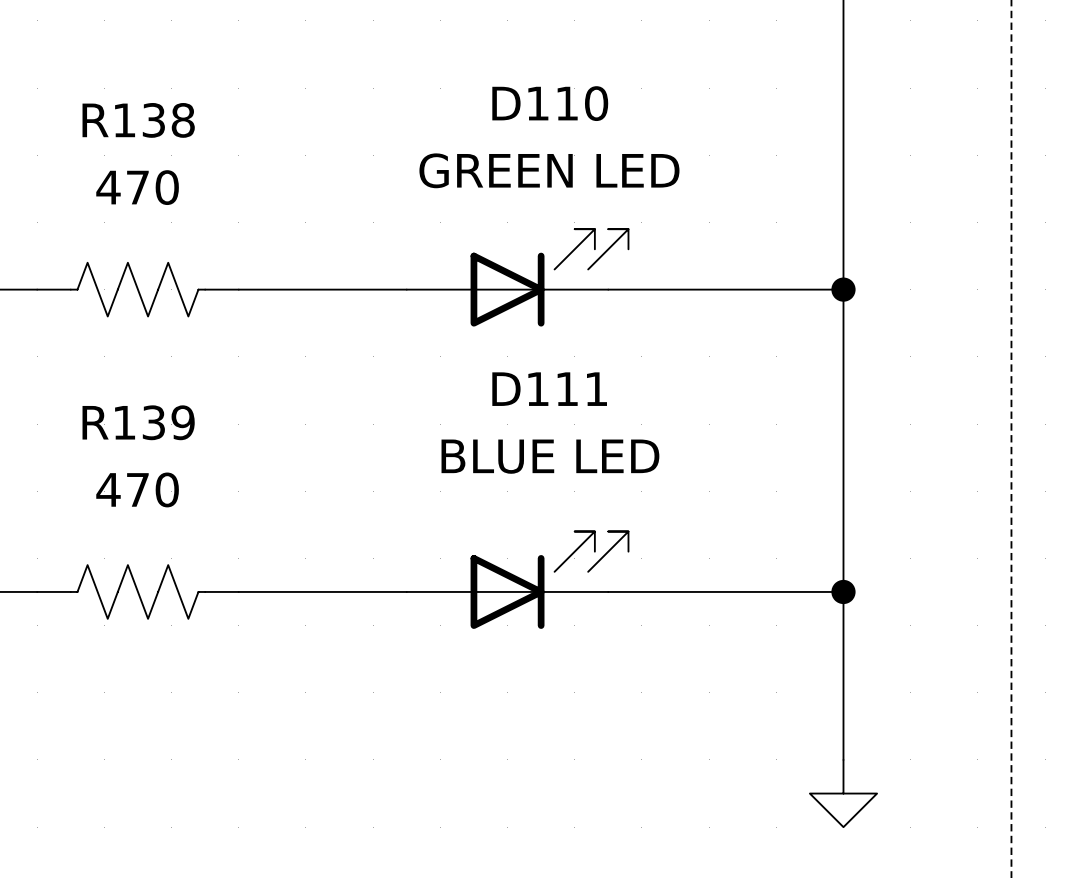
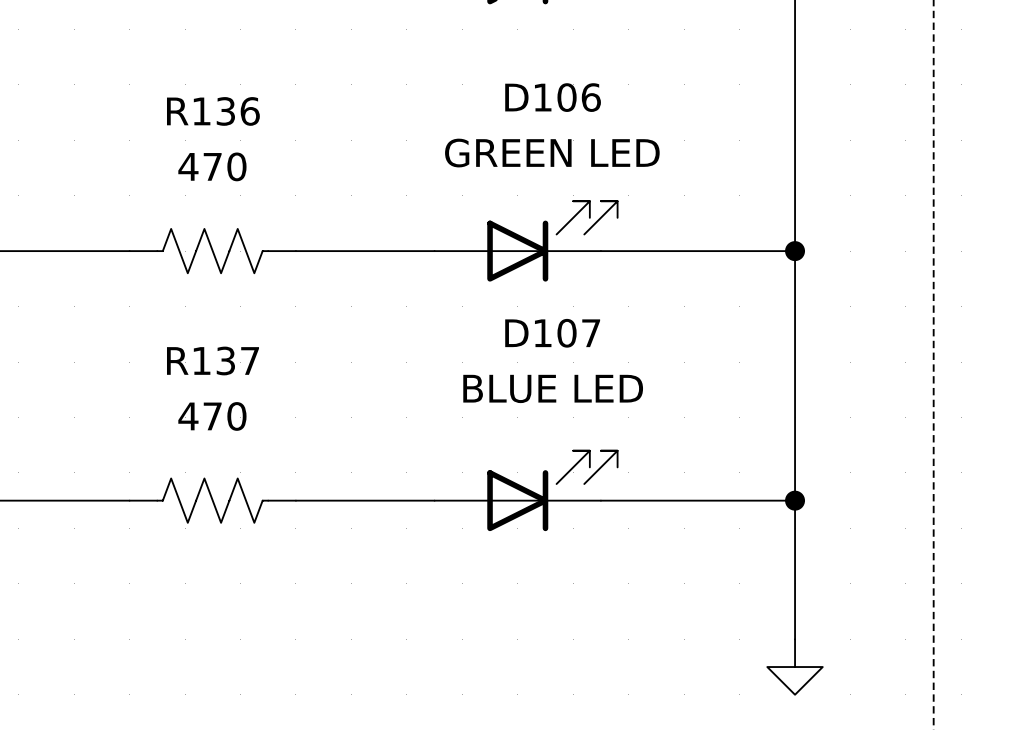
D110 name: D110 (550, 103) -> D106 (553, 97)
R138 name: R138 (138, 120) -> R136 (213, 111)
D111 name: D111 (549, 389) -> D107 (552, 333)
R139 name: R139 (138, 422) -> R137 (213, 361)

